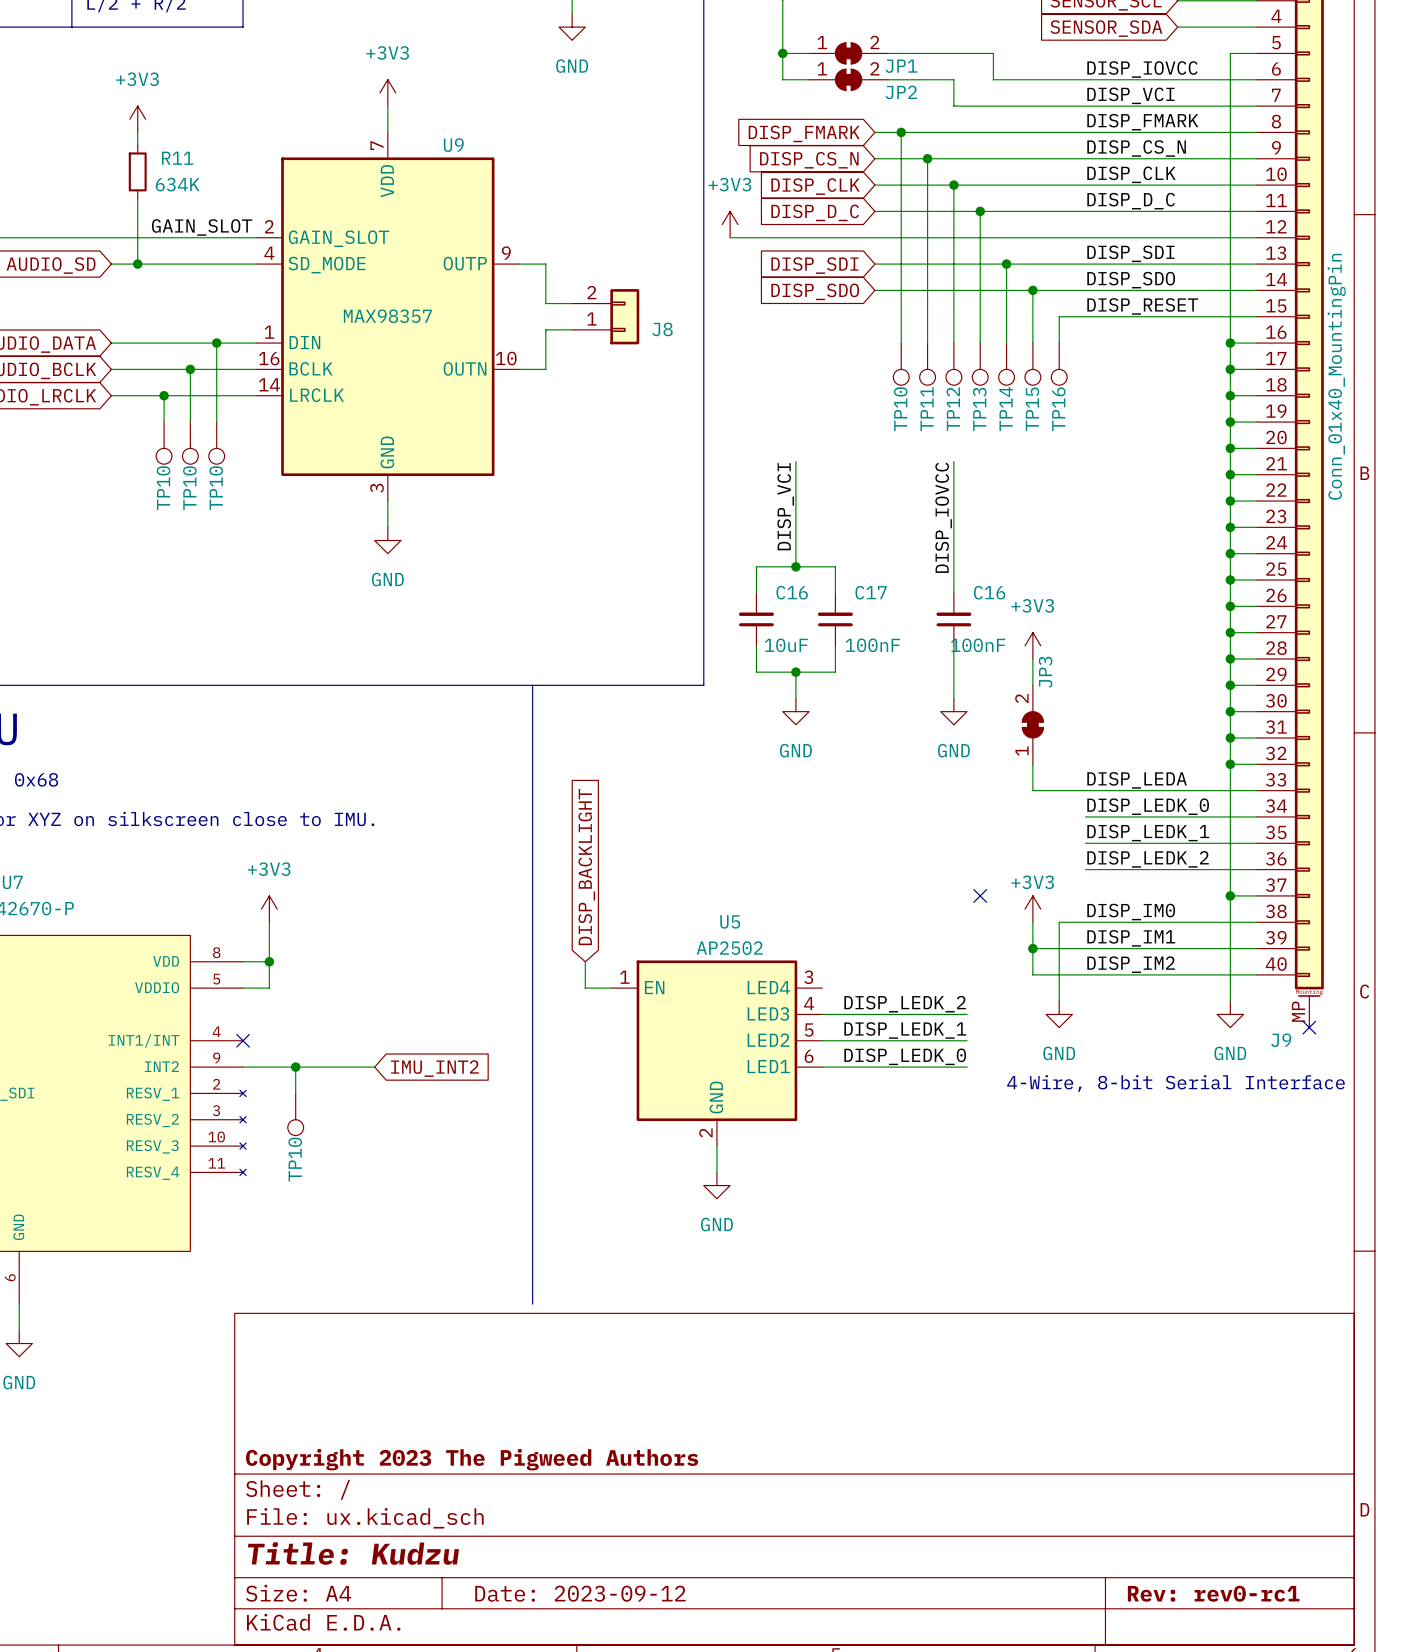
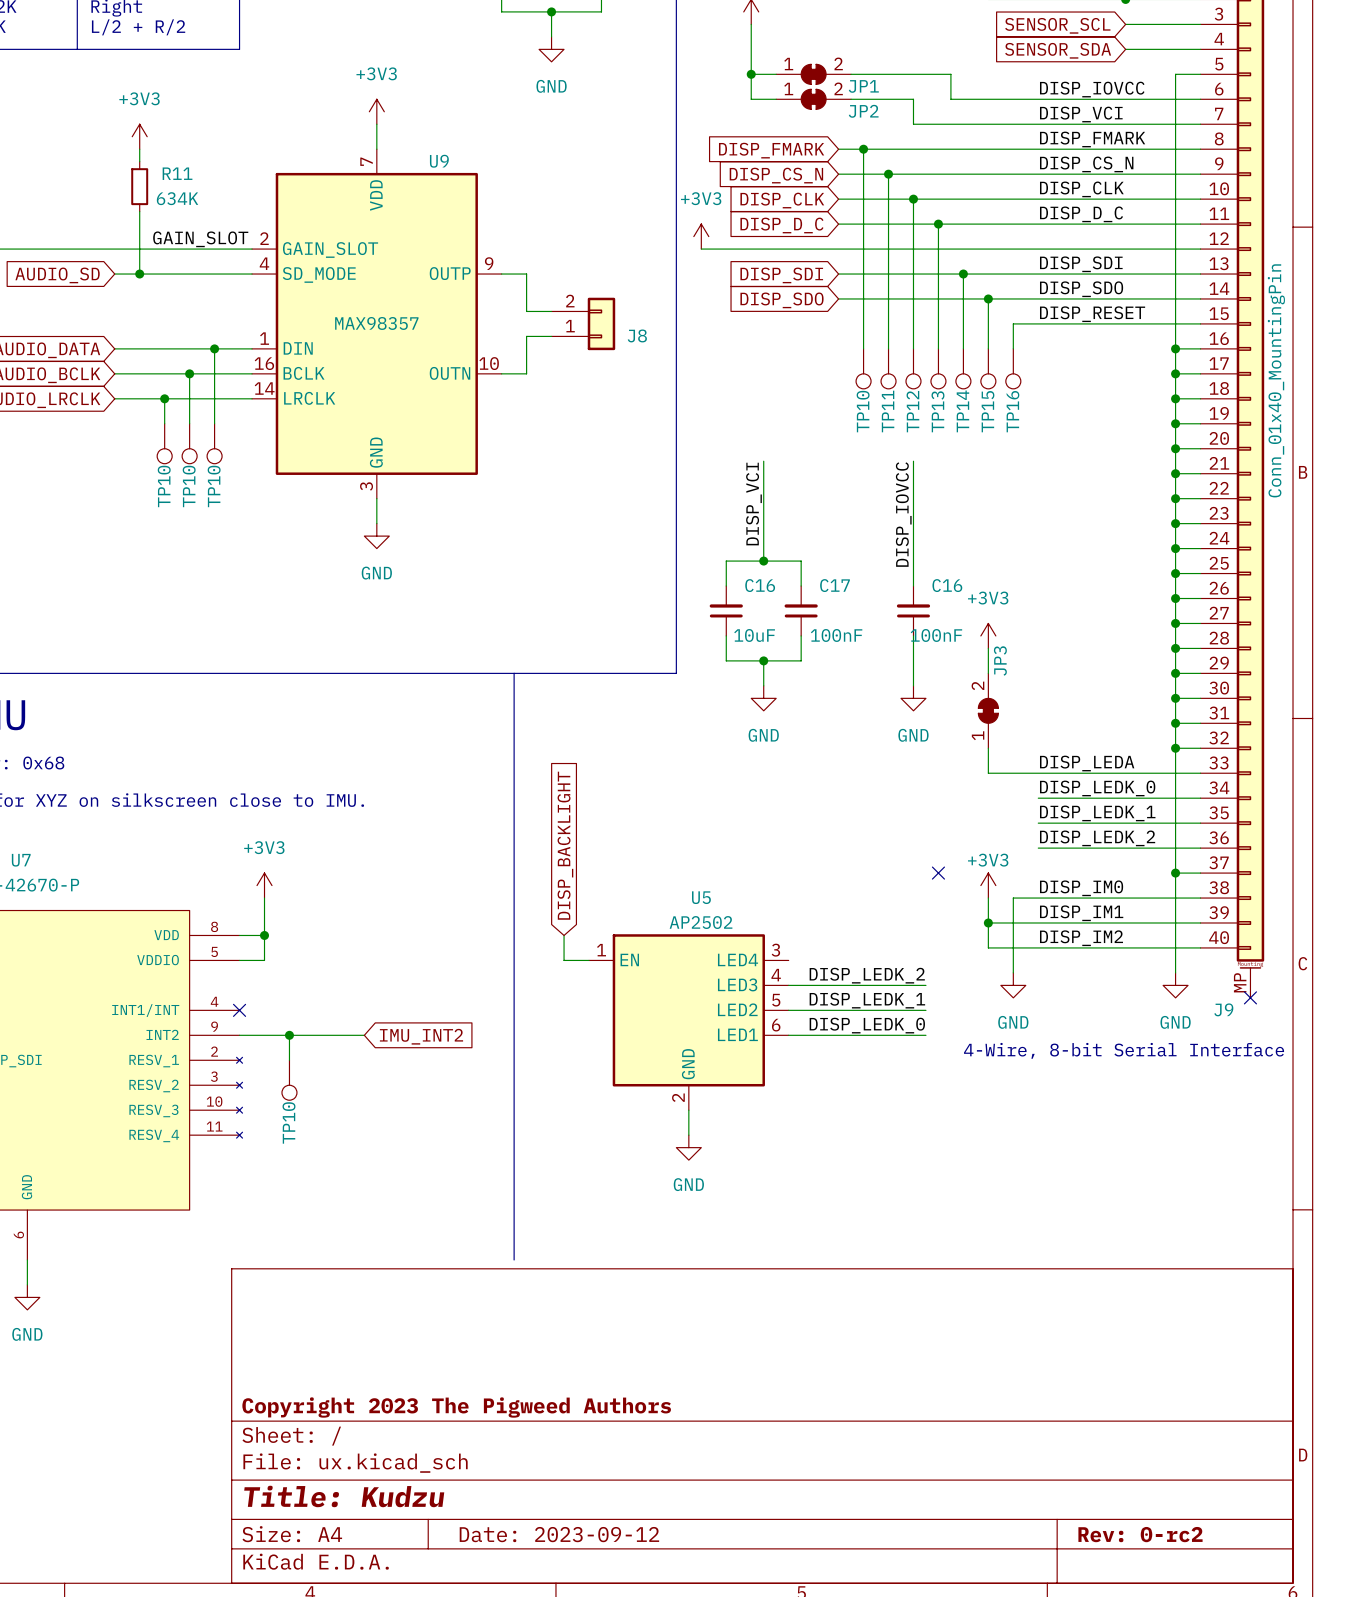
title block: Rev: rev0-rc1 (1213, 1593) -> Rev: 0-rc2 (1140, 1534)

